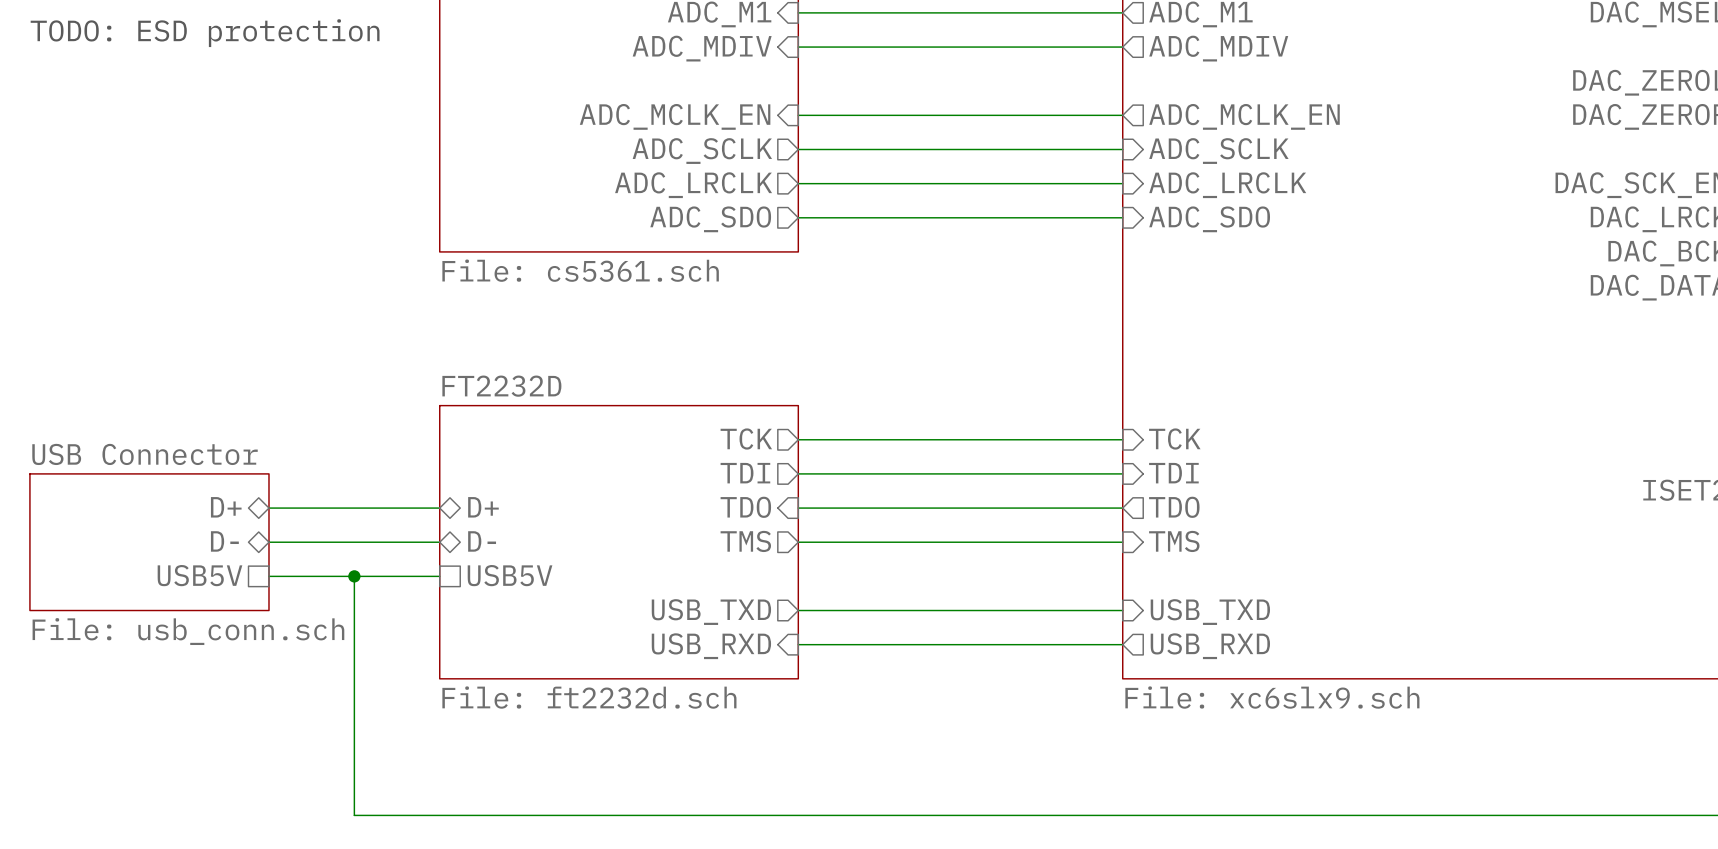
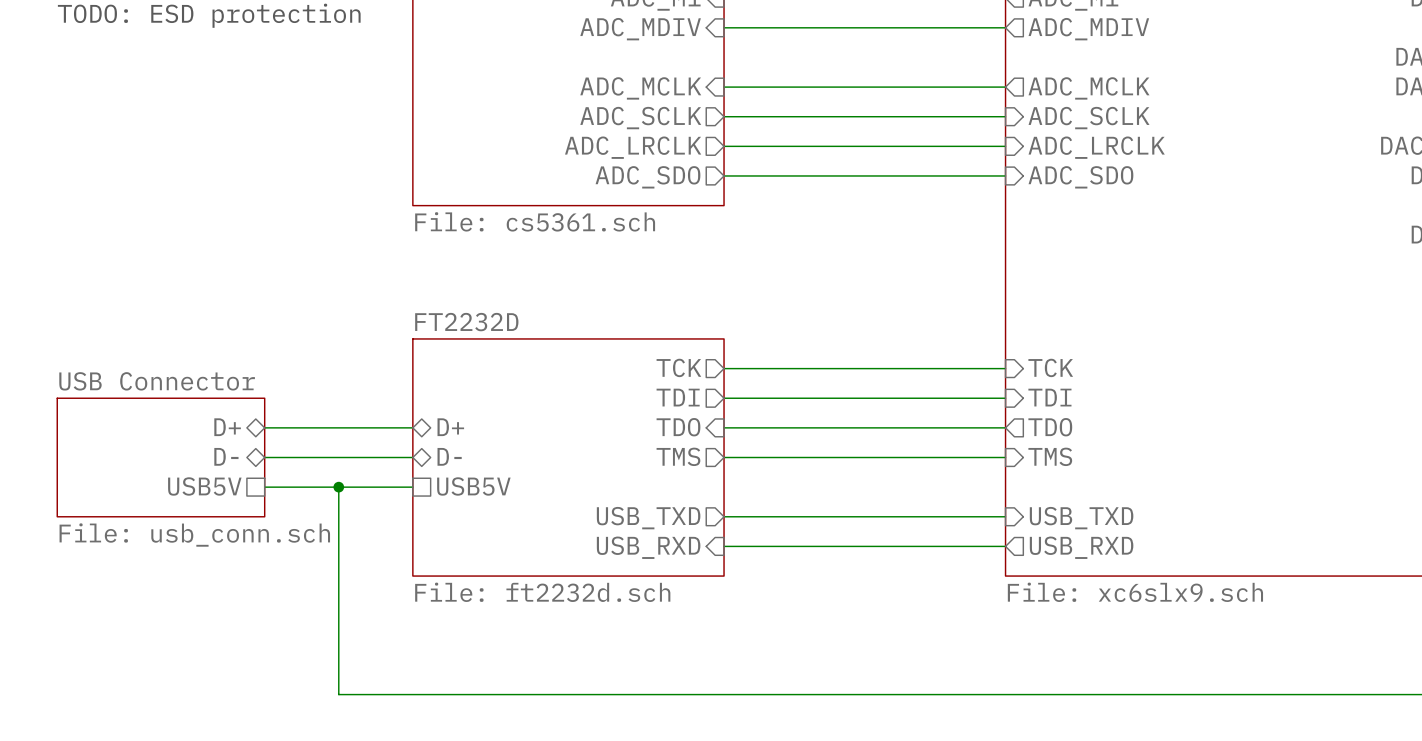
sheet pin: ADC_MCLK_EN (675, 116) -> ADC_MCLK (640, 88)
sheet pin: ADC_MCLK_EN (1244, 116) -> ADC_MCLK (1089, 88)

